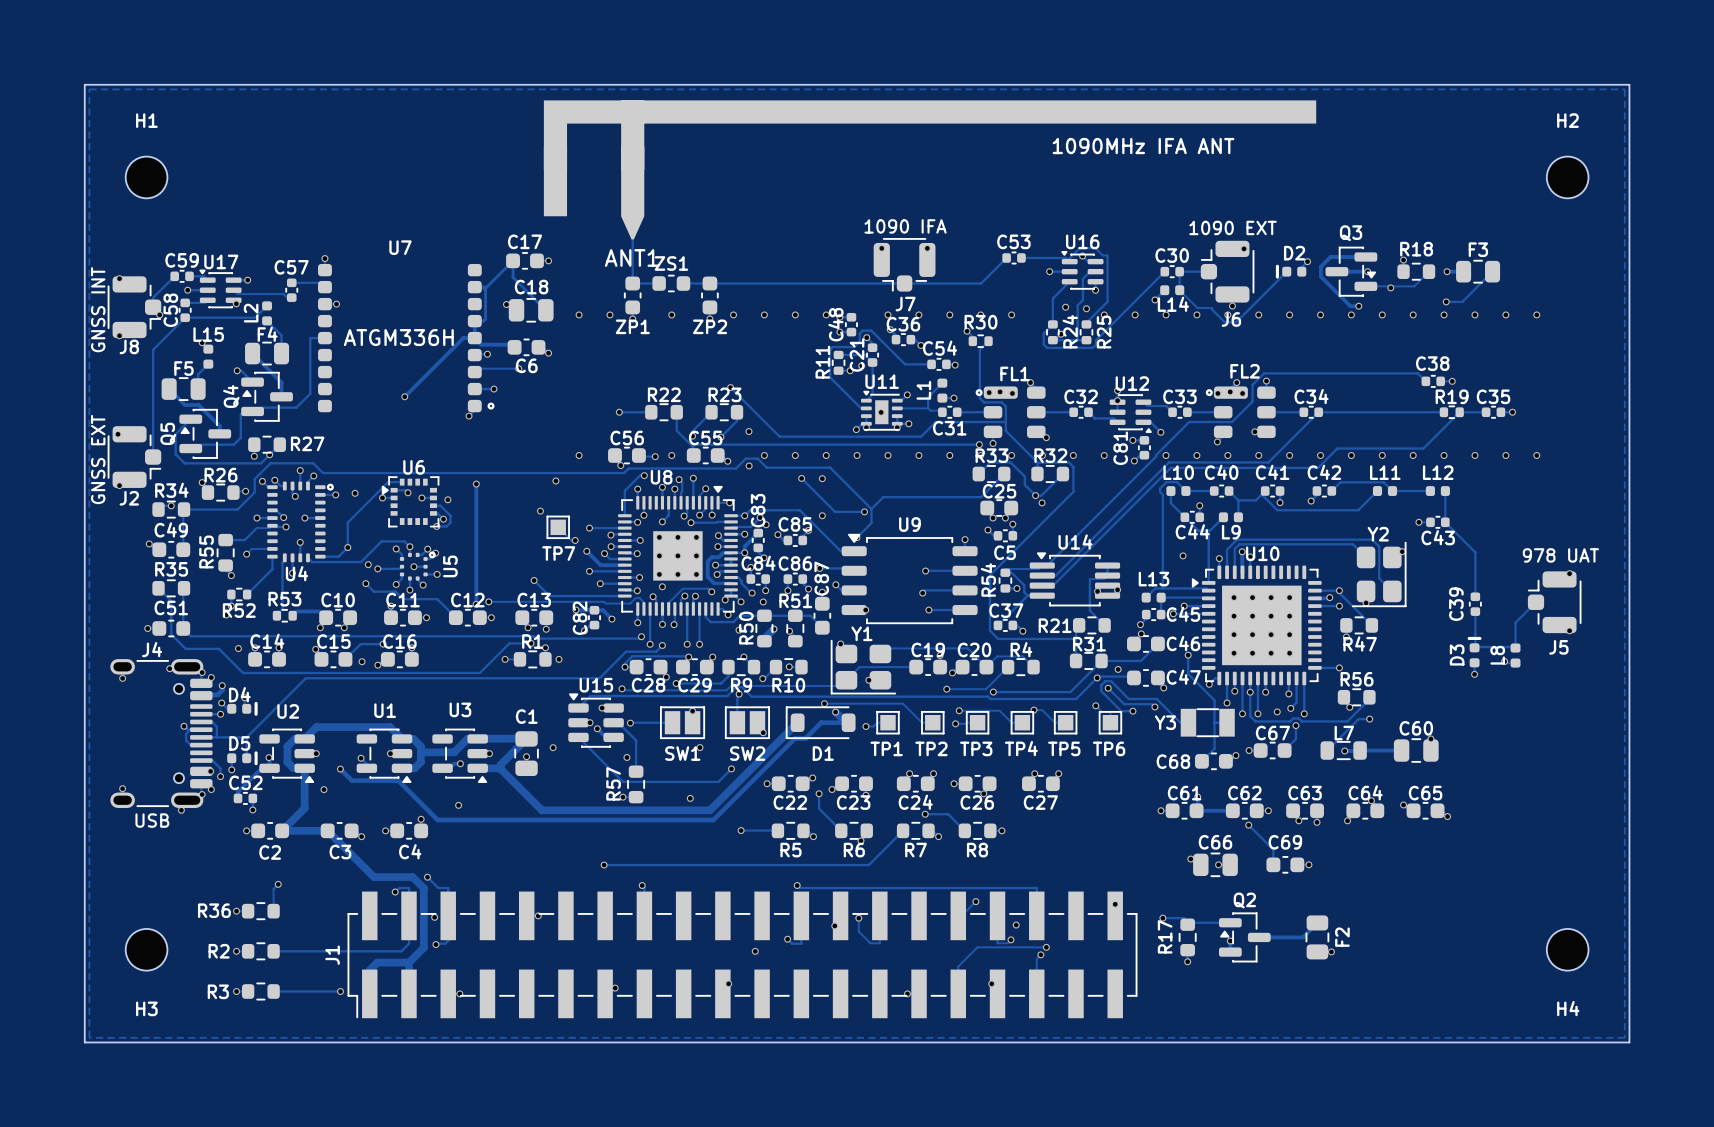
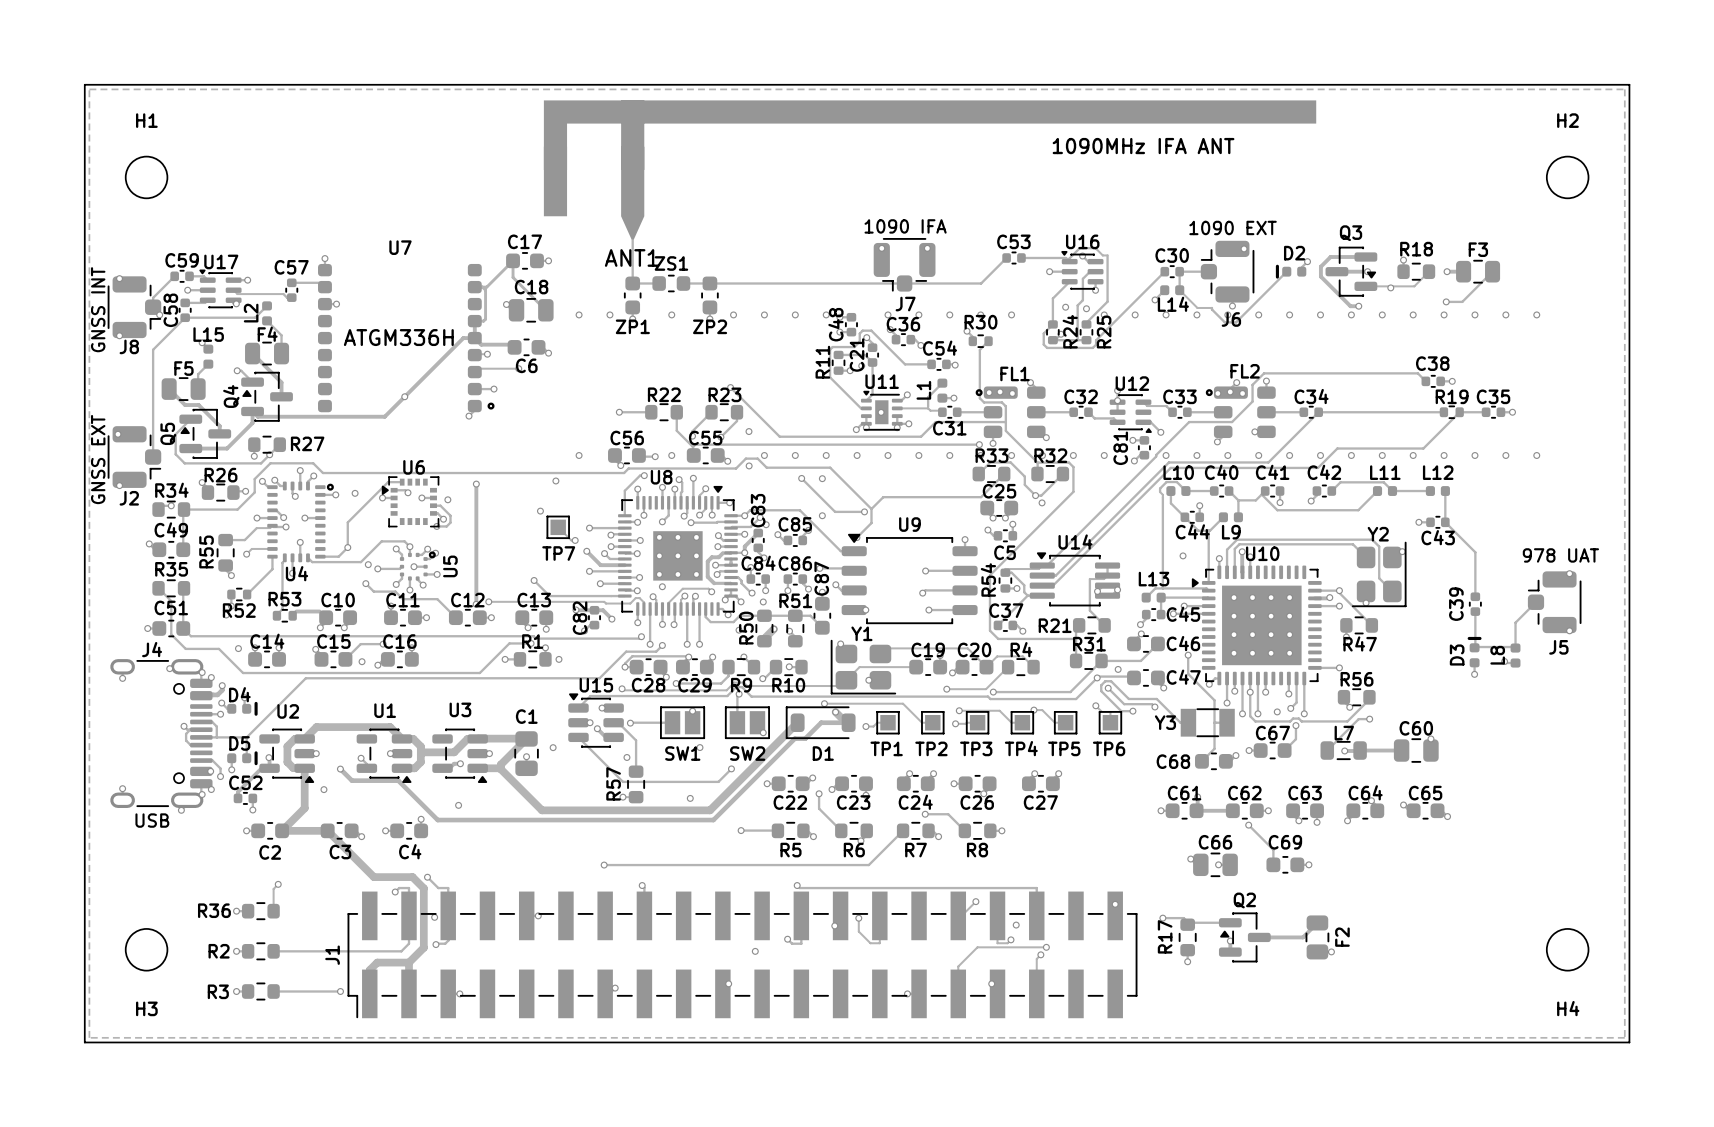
track: (324, 338) (310, 338) (310, 393) (296, 407) (263, 407) (240, 414) (240, 437) (233, 444) (201, 444) (190, 448) -> (404, 396) (384, 416) (257, 416) (252, 411) (252, 423) (227, 448) (190, 448)

